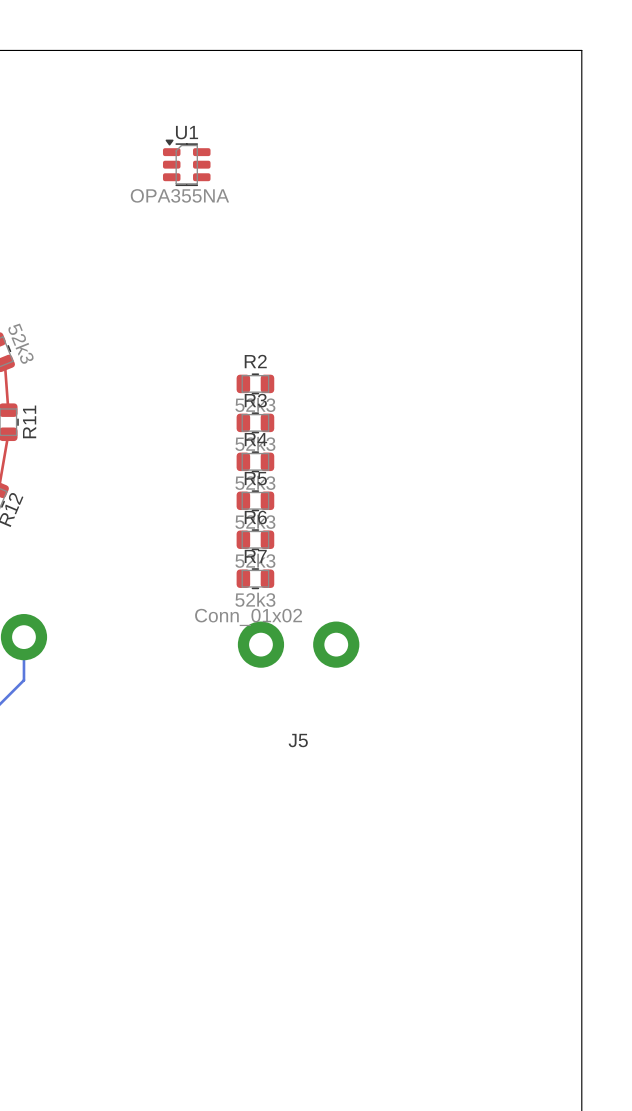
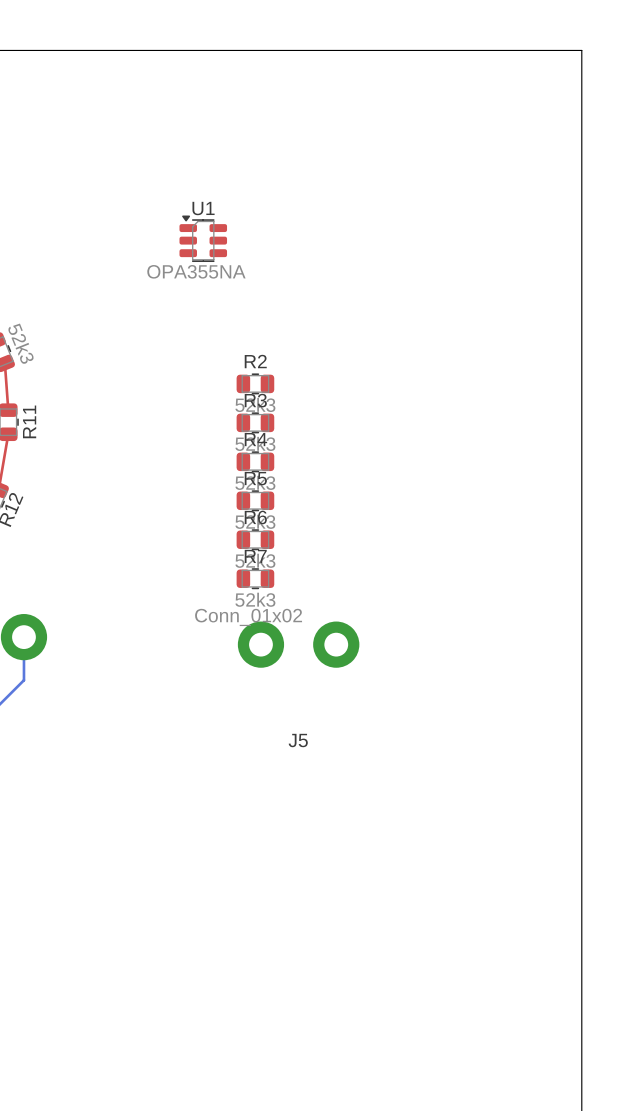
U1 position: (186, 162) -> (203, 238)

